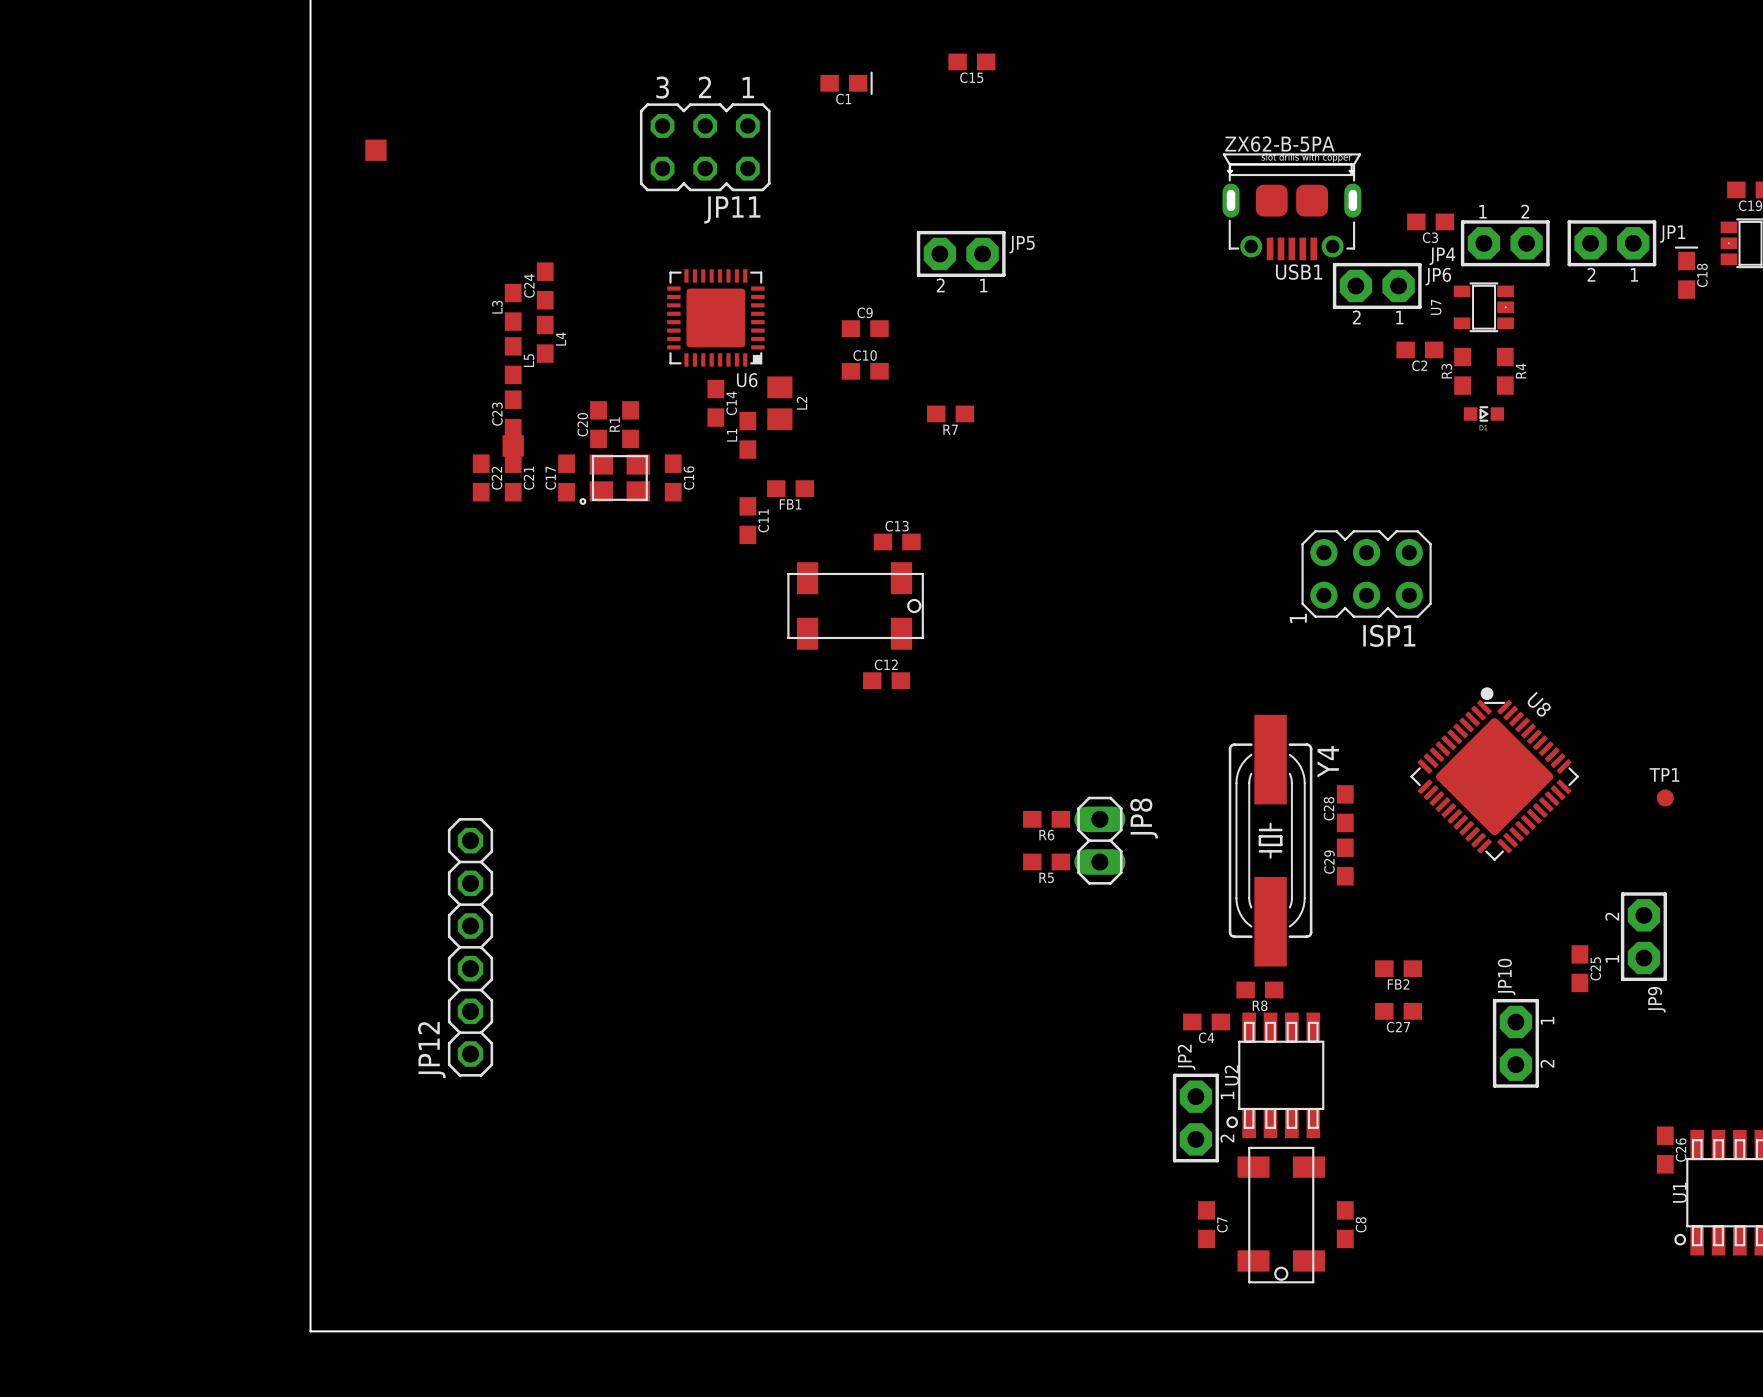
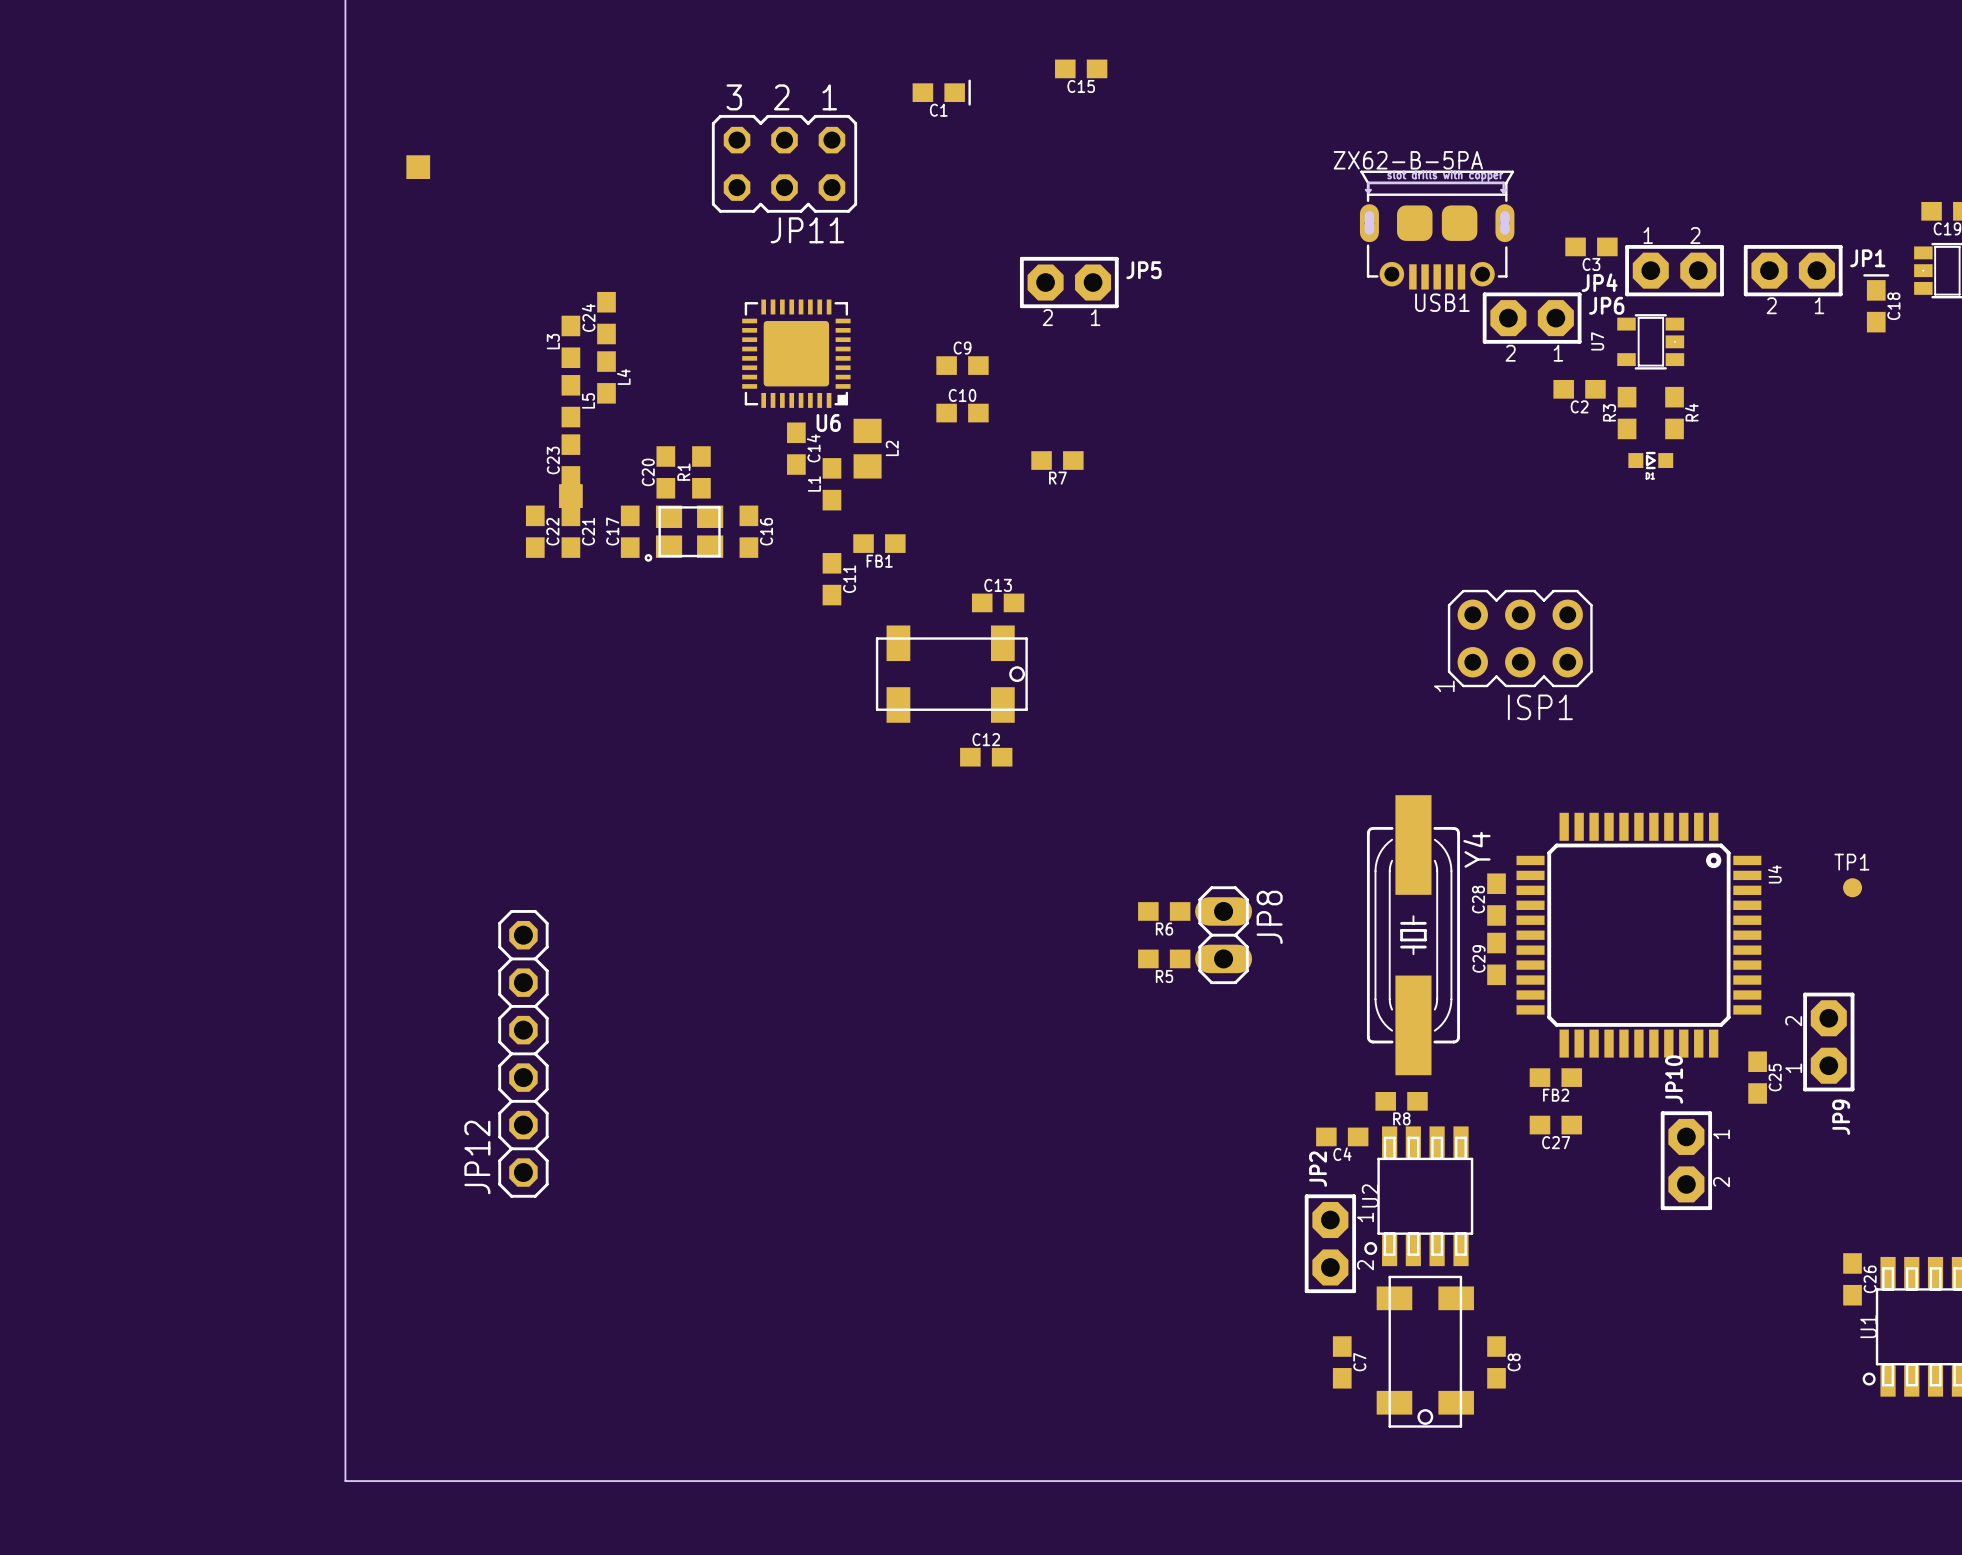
U8: (1494, 774) -> none
U4: none -> (1638, 935)

